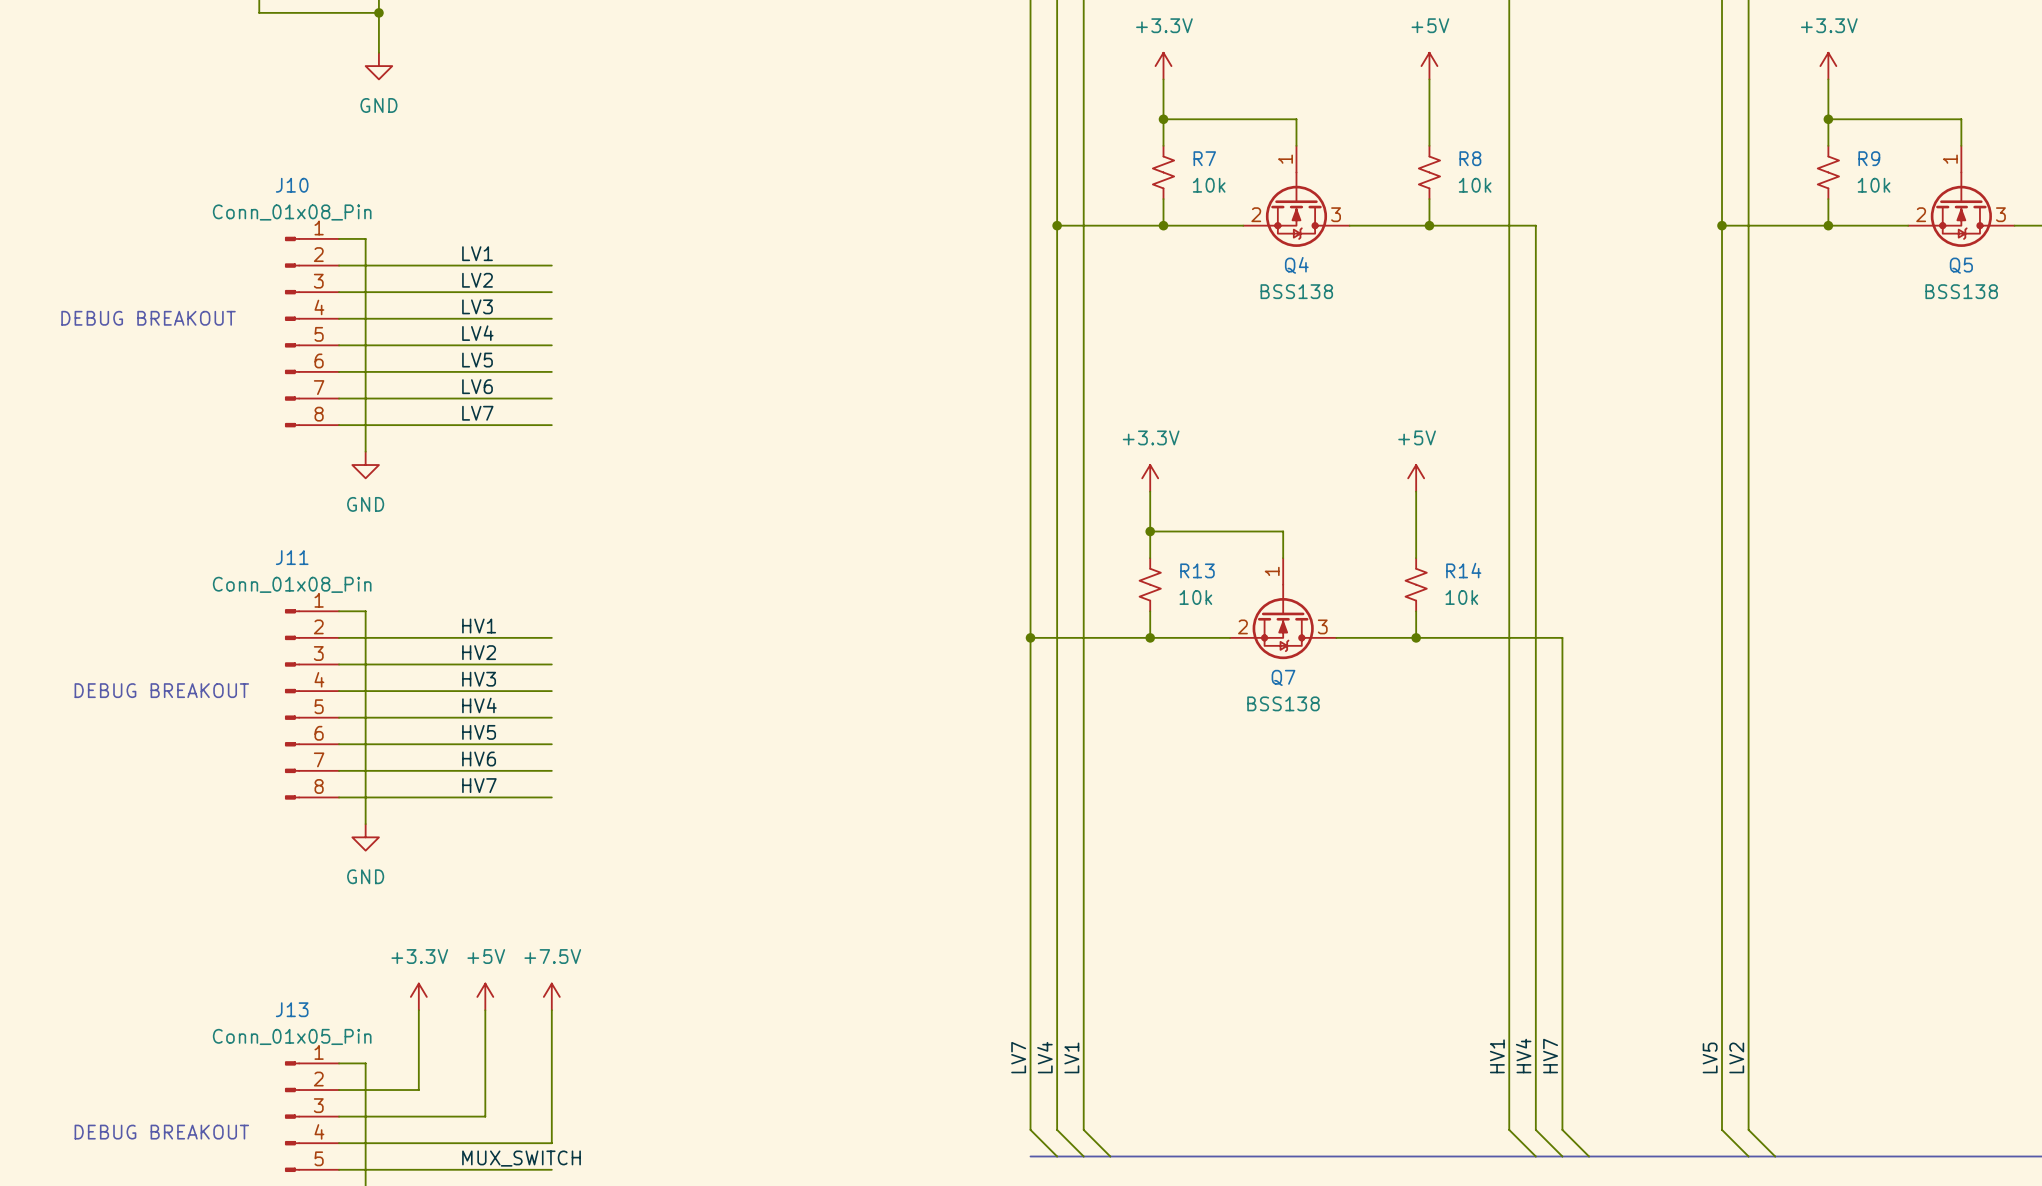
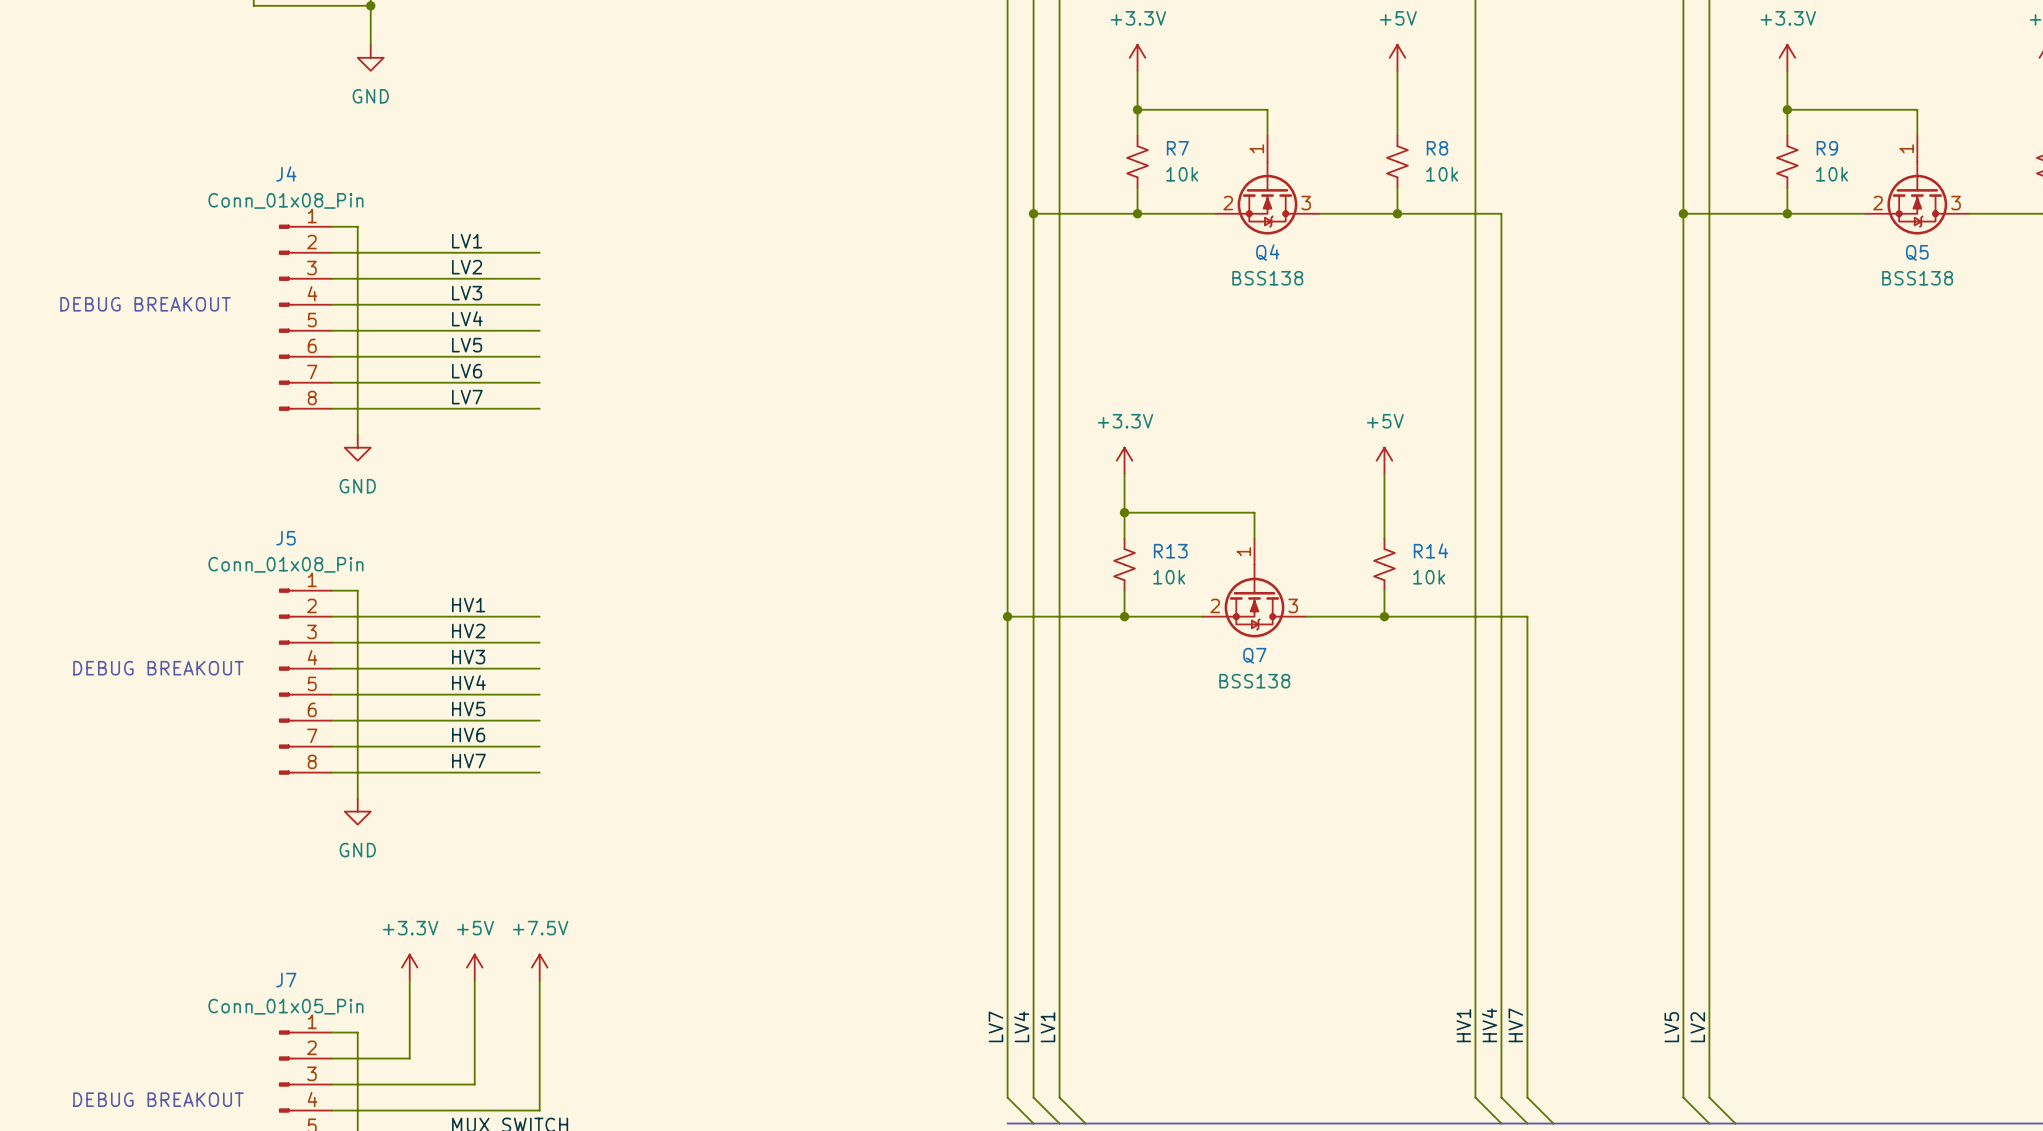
J10 name: J10 (292, 185) -> J4 (286, 173)
J11 name: J11 (292, 557) -> J5 (285, 538)
J13 name: J13 (292, 1009) -> J7 (286, 980)

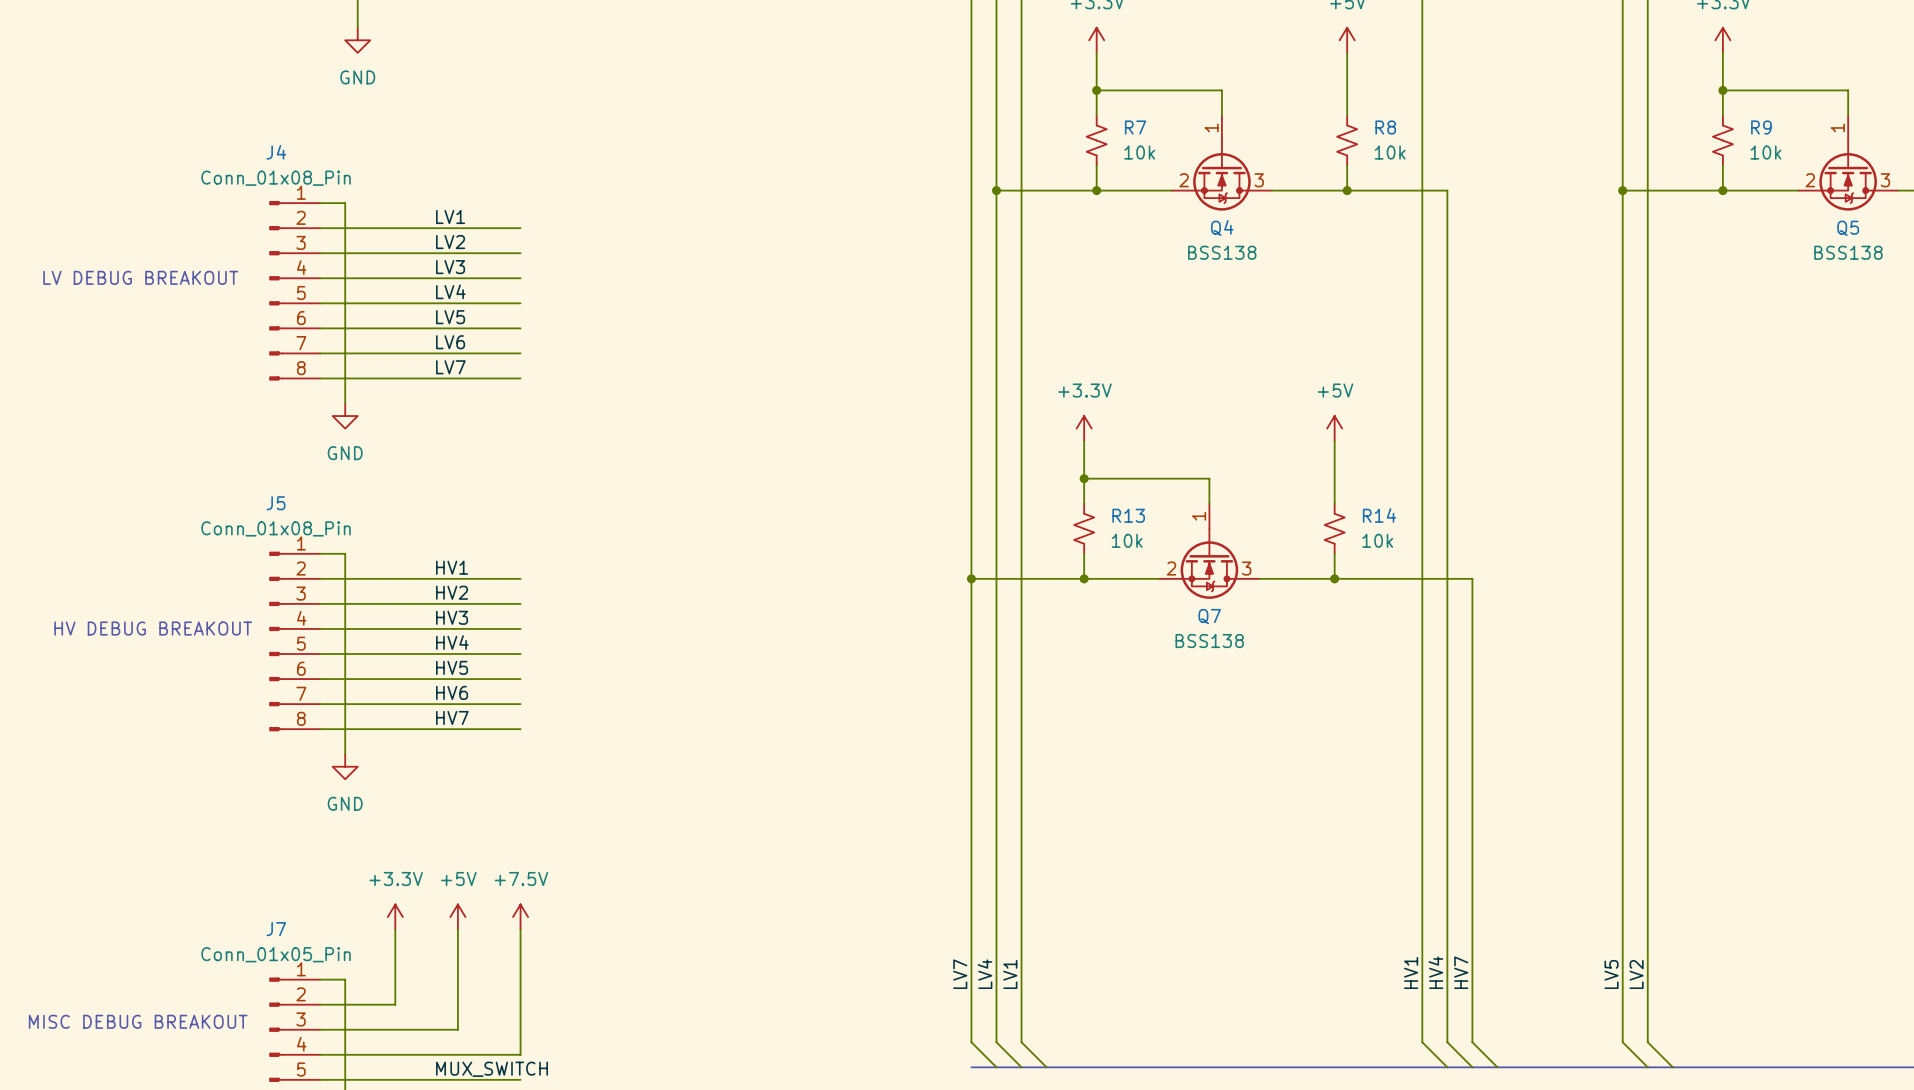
text: DEBUG BREAKOUT (145, 304) -> LV DEBUG BREAKOUT (140, 277)
text: DEBUG BREAKOUT (158, 668) -> HV DEBUG BREAKOUT (153, 628)
text: DEBUG BREAKOUT (158, 1099) -> MISC DEBUG BREAKOUT (138, 1021)

